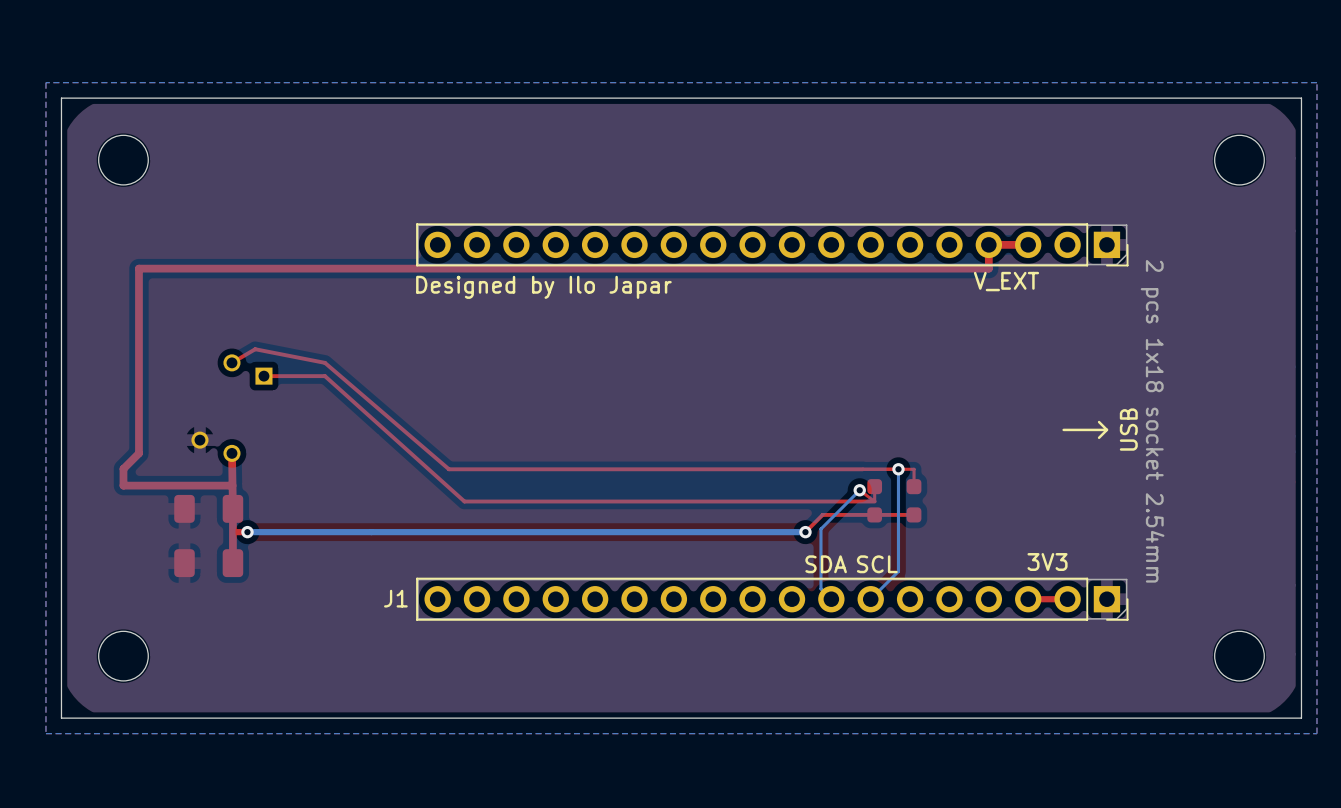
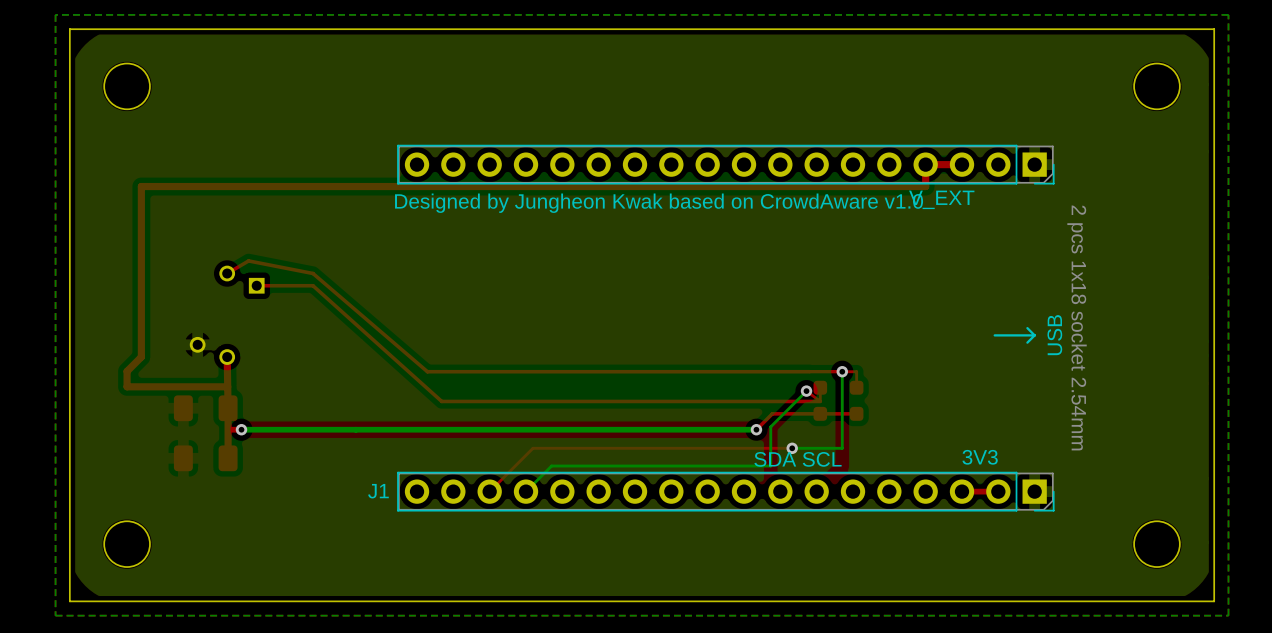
text: Designed by Ilo Japar (543, 287) -> Designed by Jungheon Kwak based on CrowdAware v1.0 (659, 203)
top track: none -> (792, 448) (532, 448) (489, 491)
via: none -> (792, 448)
bottom track: (898, 552) (898, 571) (870, 599) -> (842, 448) (792, 448)
bottom track: (820, 571) (820, 588) (831, 599) -> (770, 466) (551, 466) (526, 491)

